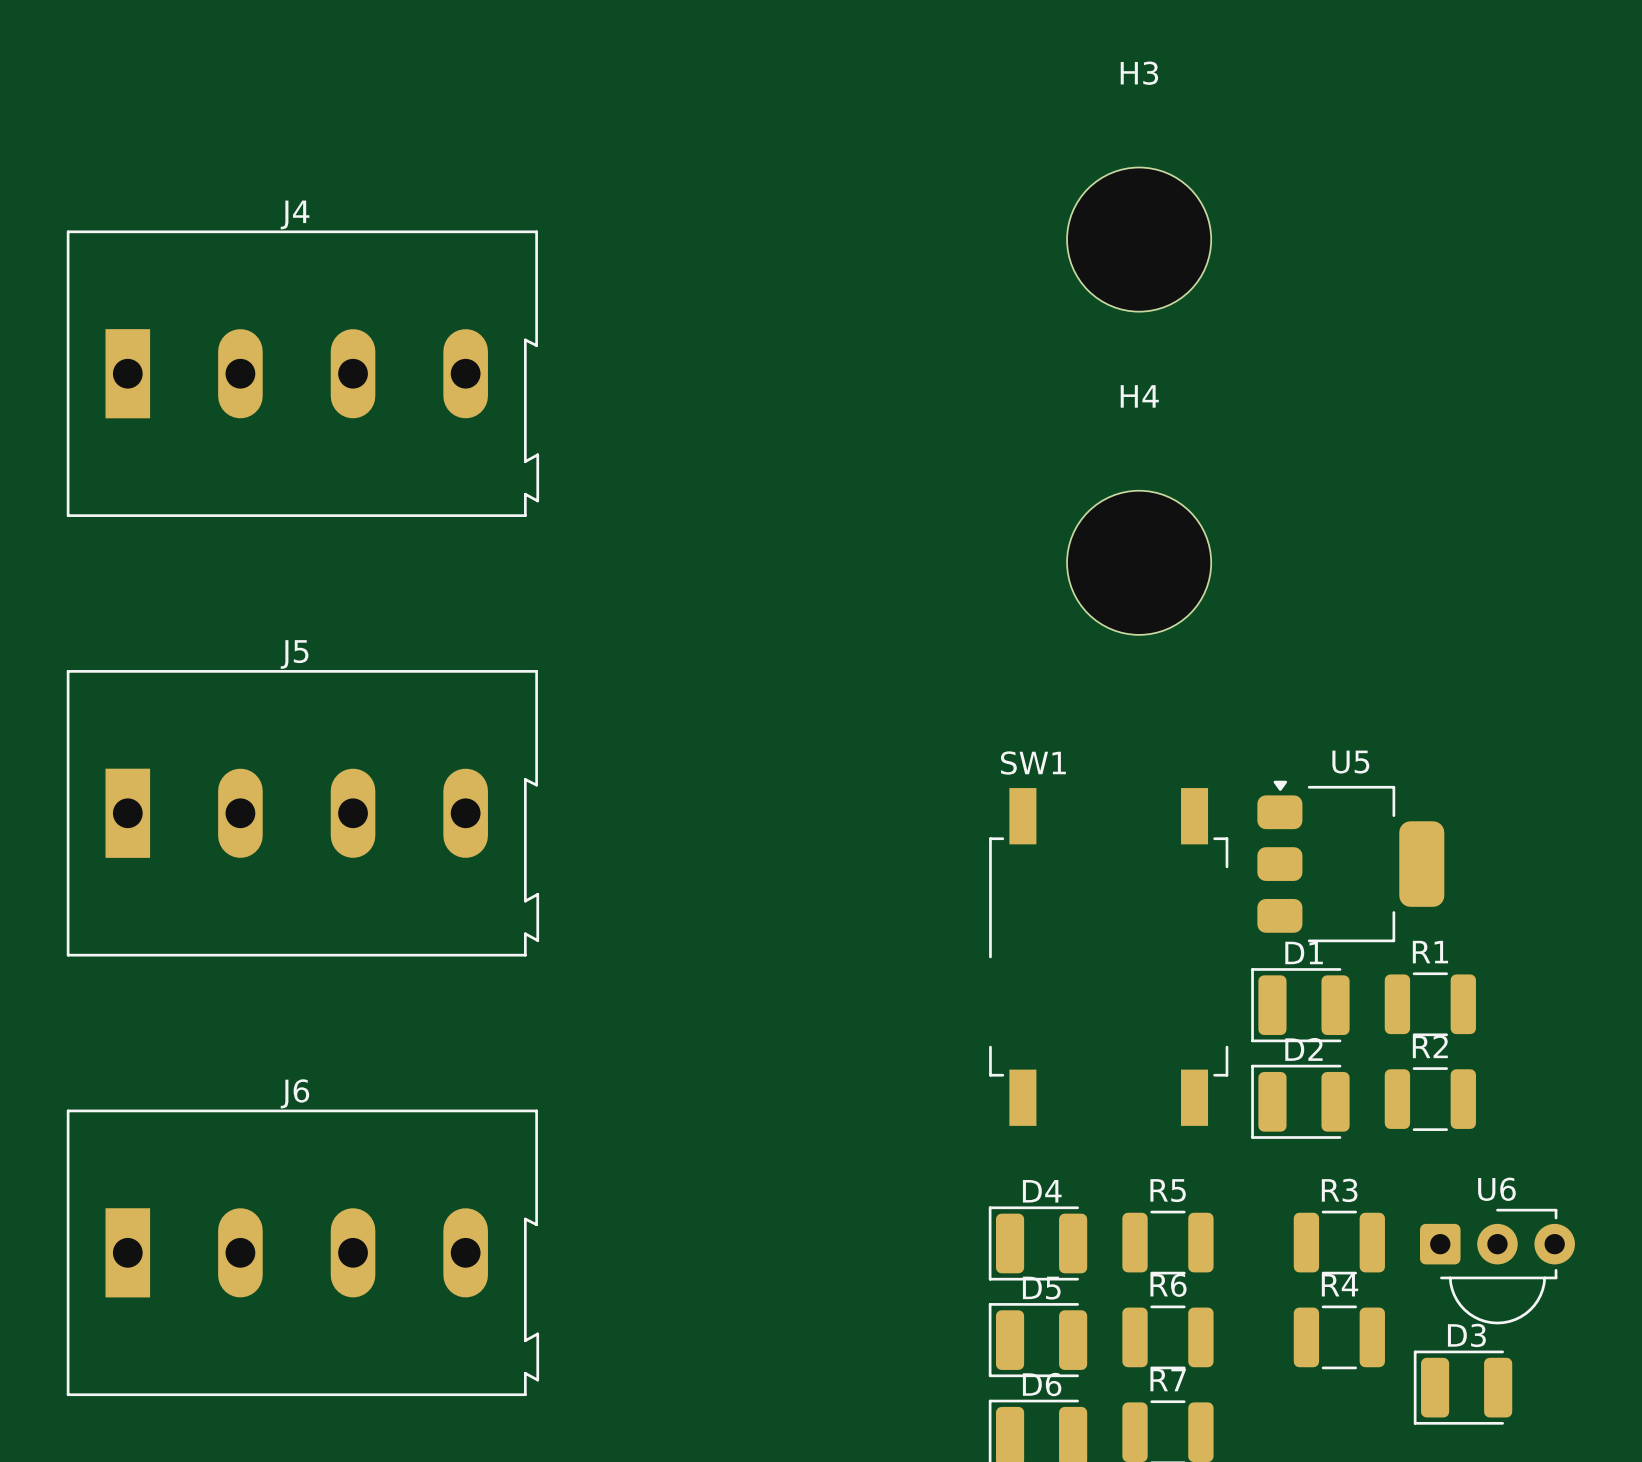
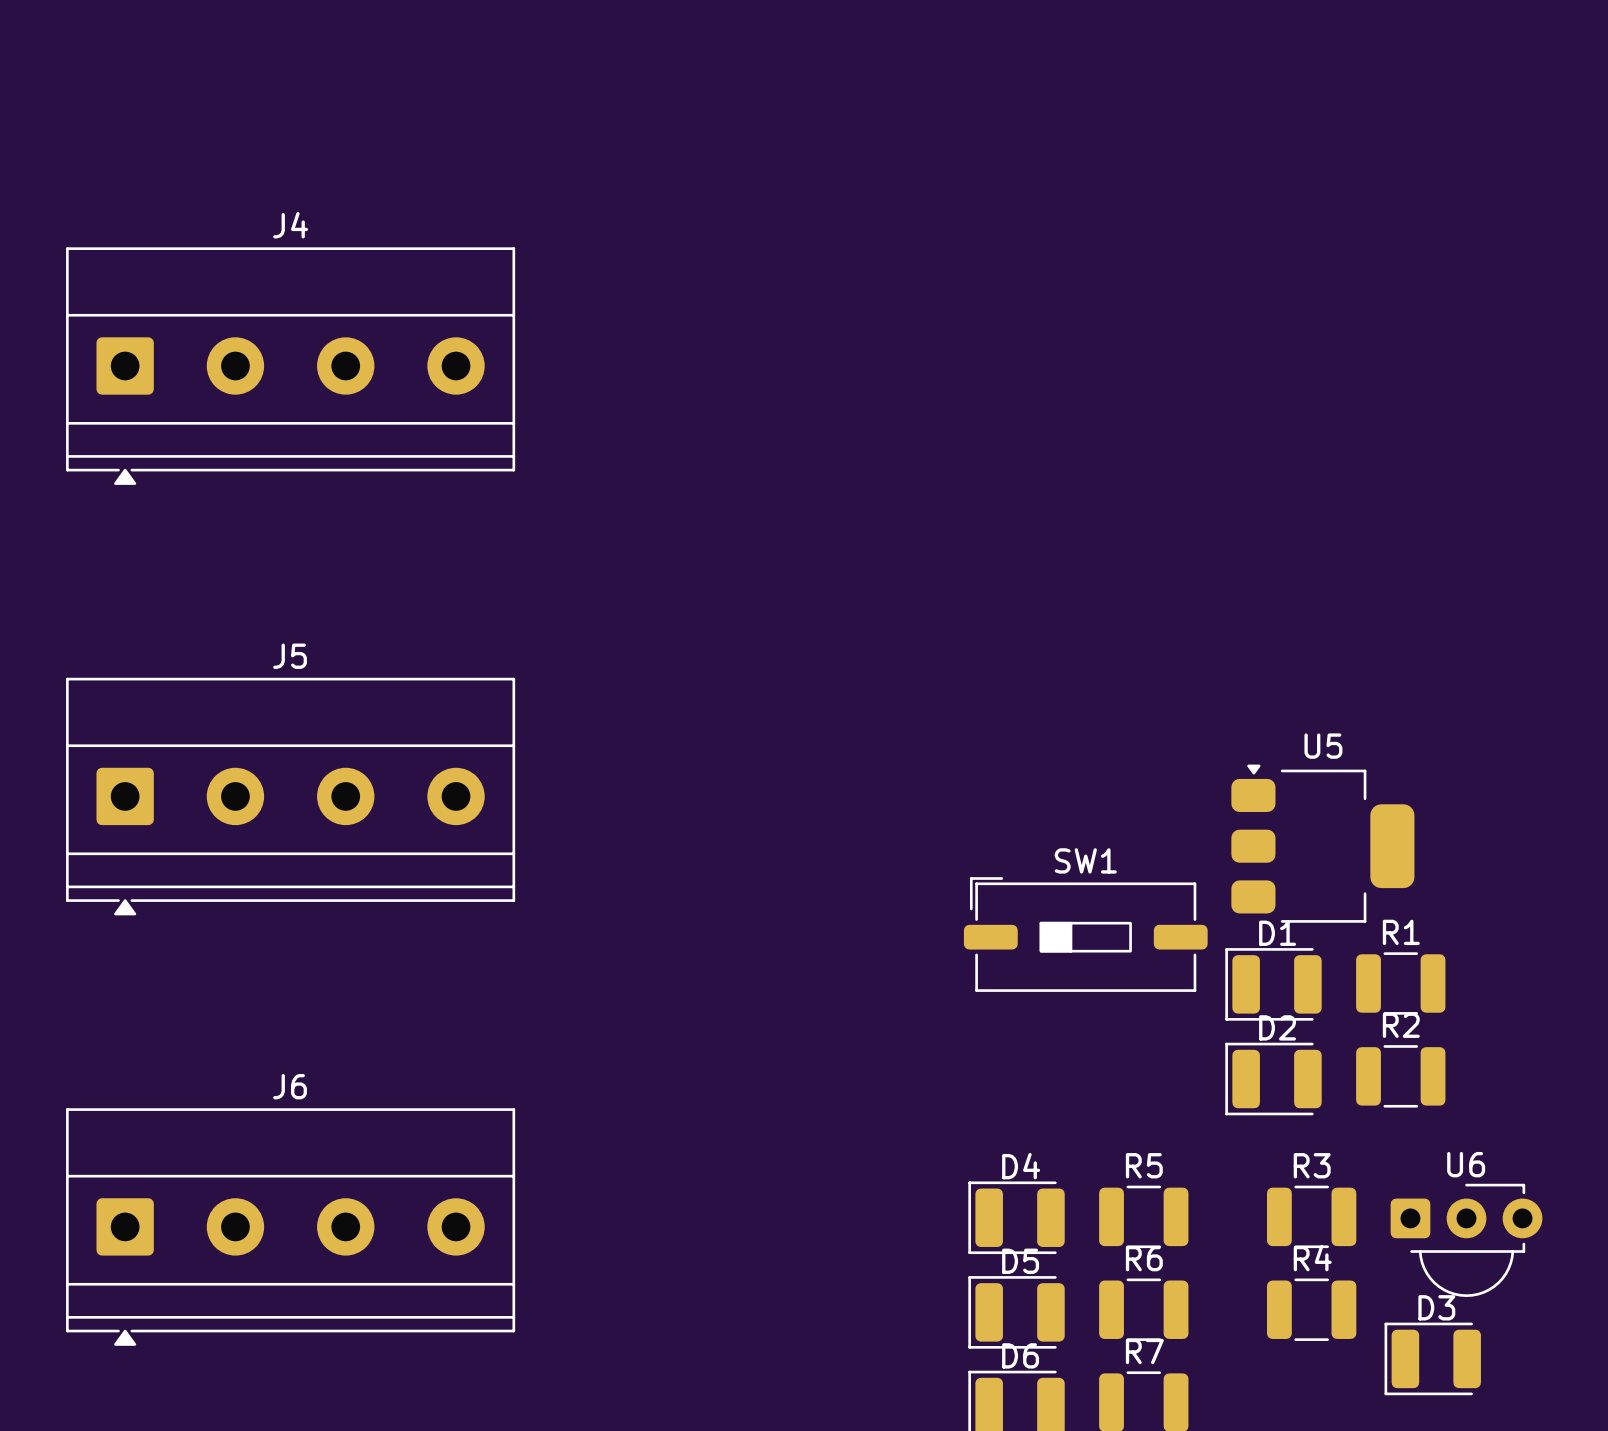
J4 footprint: [66, 230, 540, 517] -> [66, 247, 516, 485]
H3: (1139, 239) -> none
H4: (1139, 562) -> none
J5 footprint: [66, 670, 540, 957] -> [66, 677, 516, 916]
SW1 name position: SW1 (1033, 763) -> SW1 (1085, 860)
SW1 footprint: [989, 788, 1229, 1126] -> [963, 877, 1208, 992]
J6 footprint: [66, 1109, 540, 1397] -> [66, 1108, 516, 1346]

